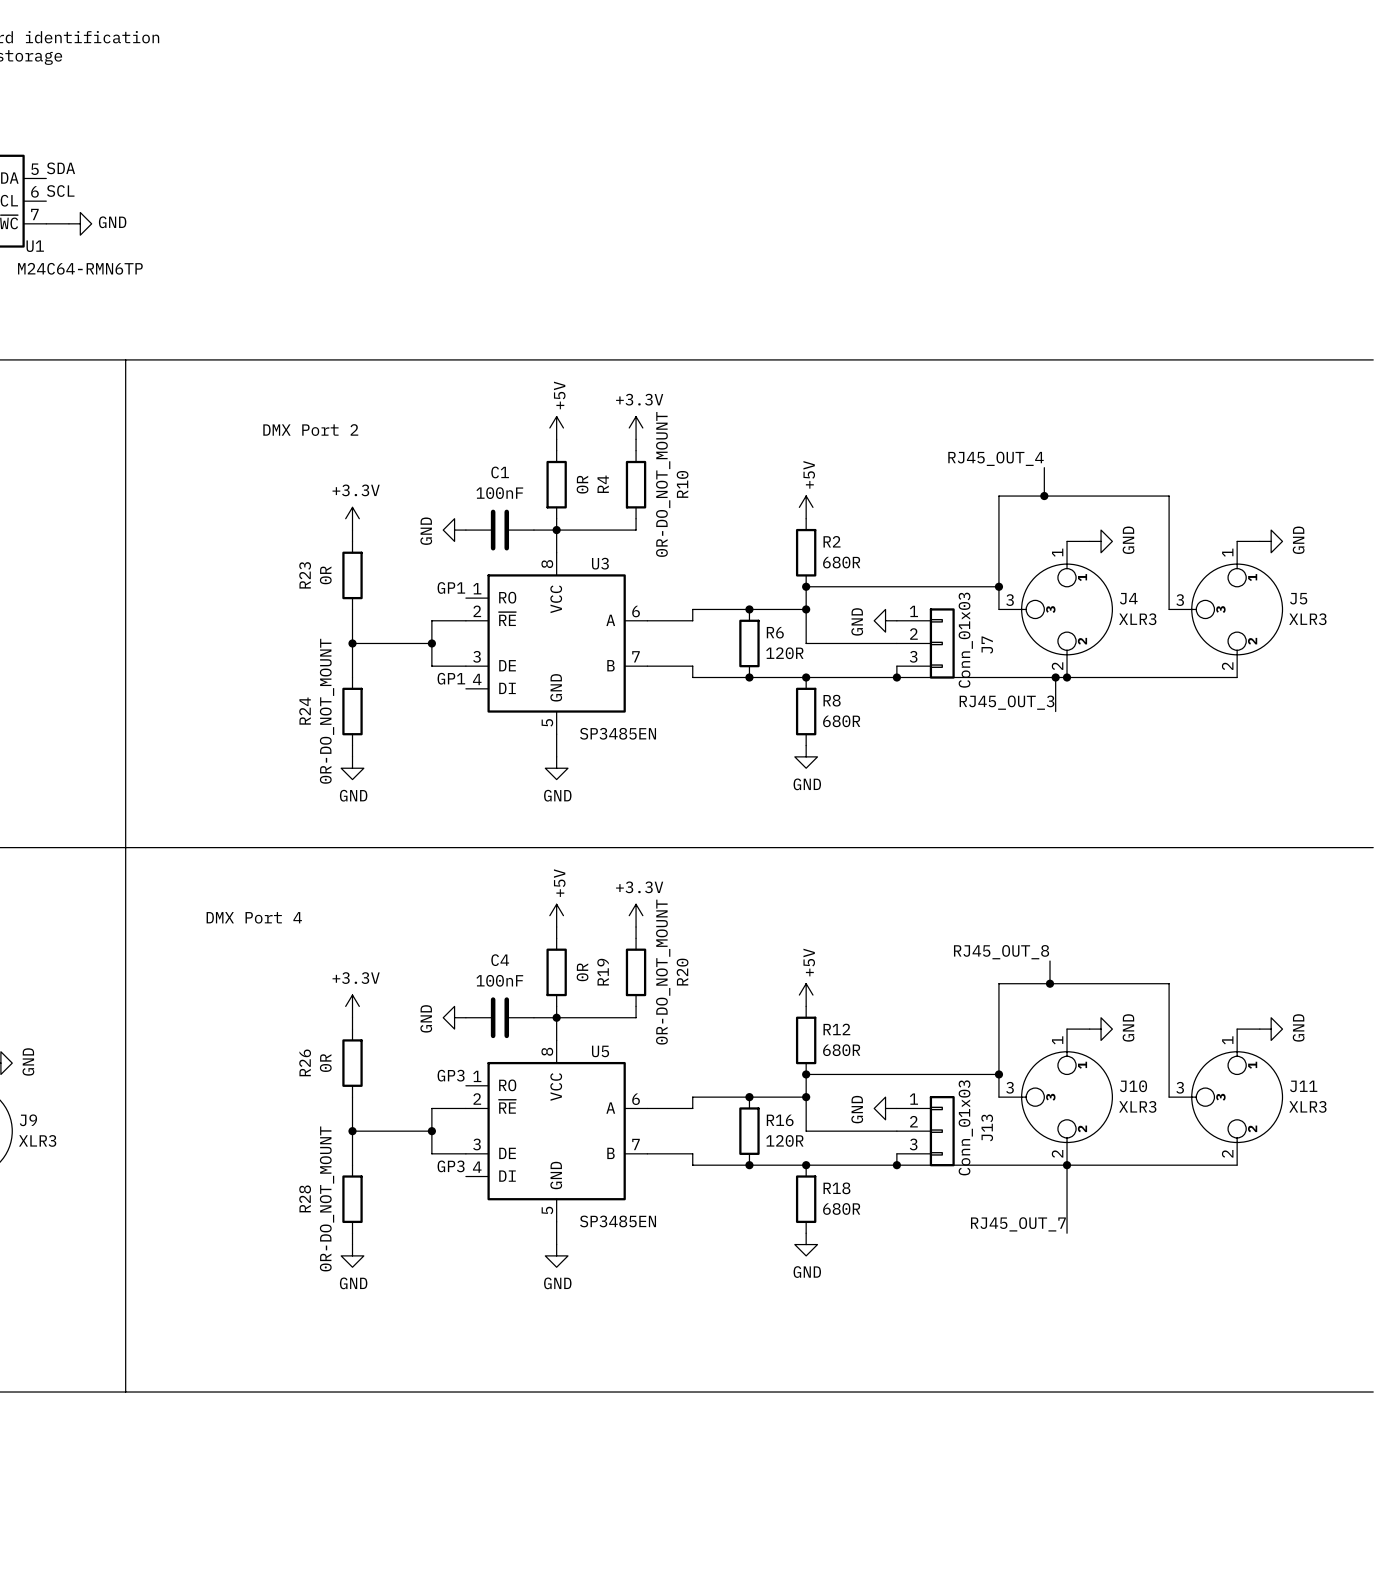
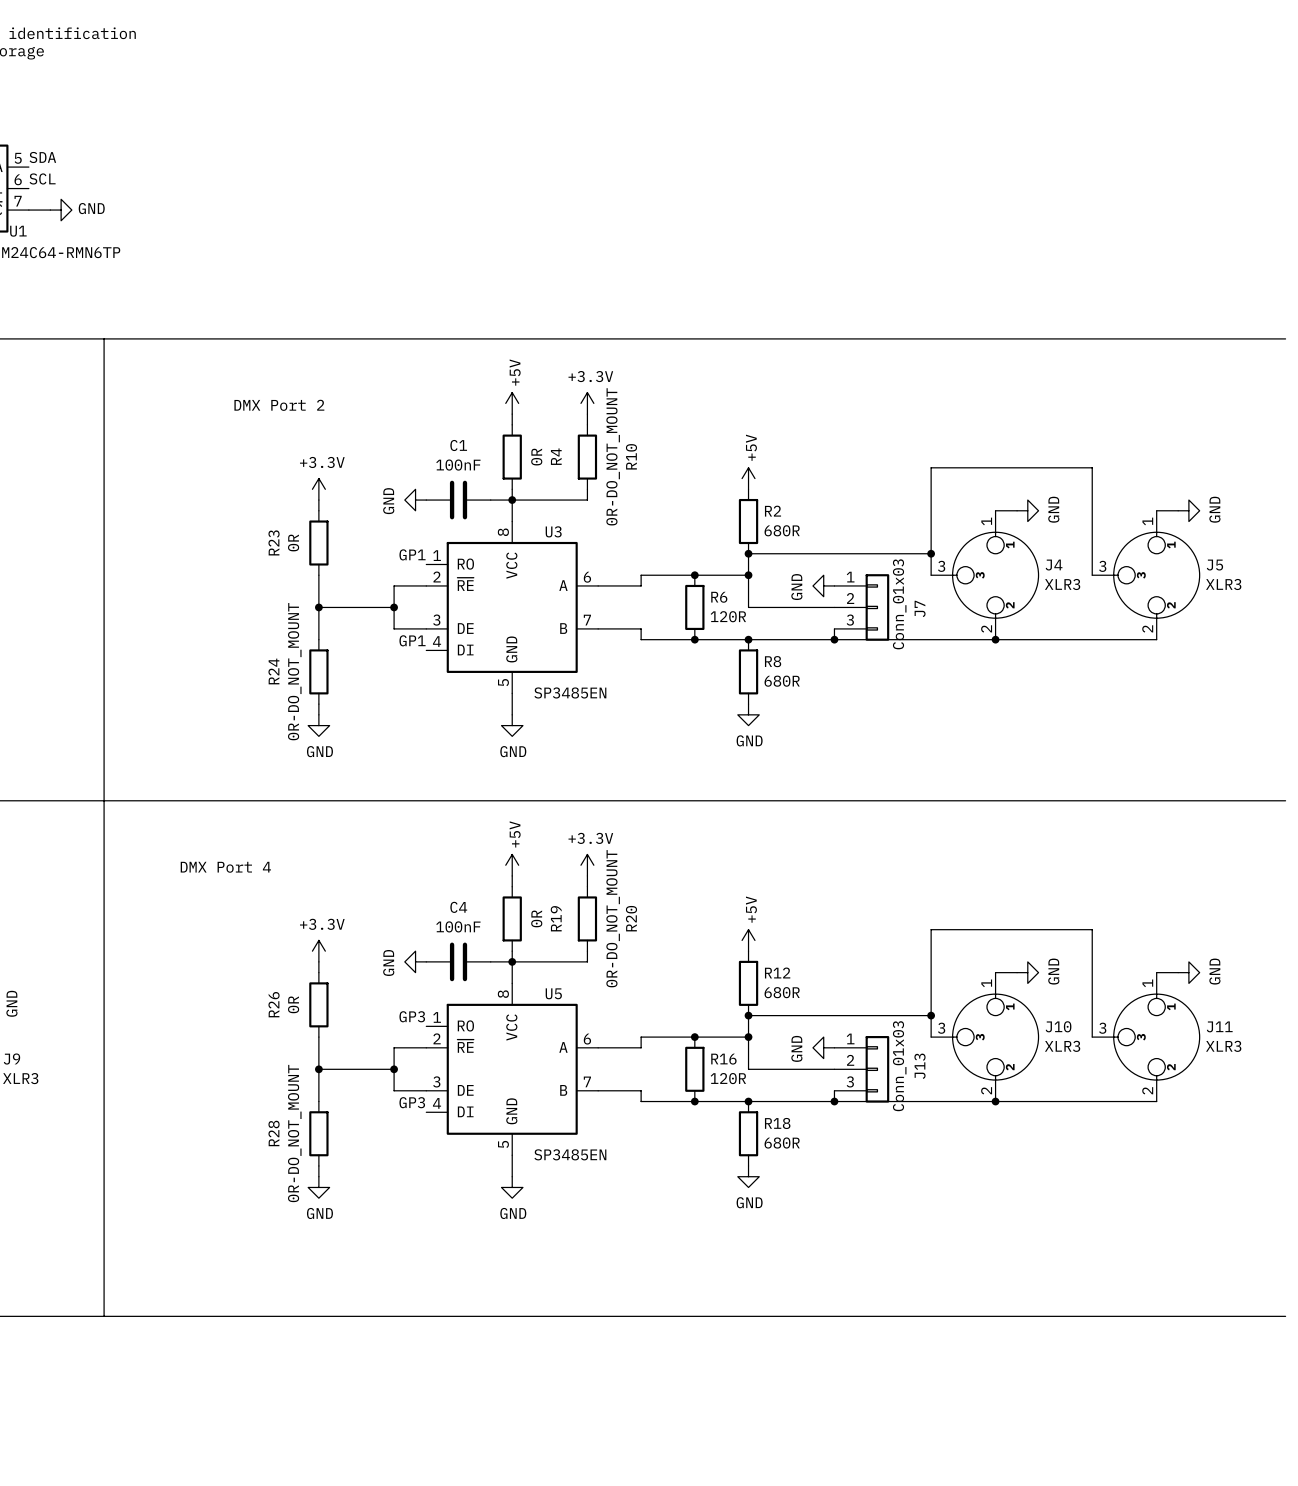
label: RJ45_OUT_4 (996, 458) -> none
wire: (1044, 467) (1044, 496) -> none
junction: (1044, 496) -> none
wire: (1055, 677) (1055, 711) -> none
junction: (1055, 677) -> none
label: RJ45_OUT_3 (1006, 702) -> none
label: RJ45_OUT_8 (1001, 952) -> none
wire: (1050, 961) (1050, 983) -> none
junction: (1050, 983) -> none
wire: (1067, 1165) (1067, 1233) -> none
label: RJ45_OUT_7 (1018, 1224) -> none

